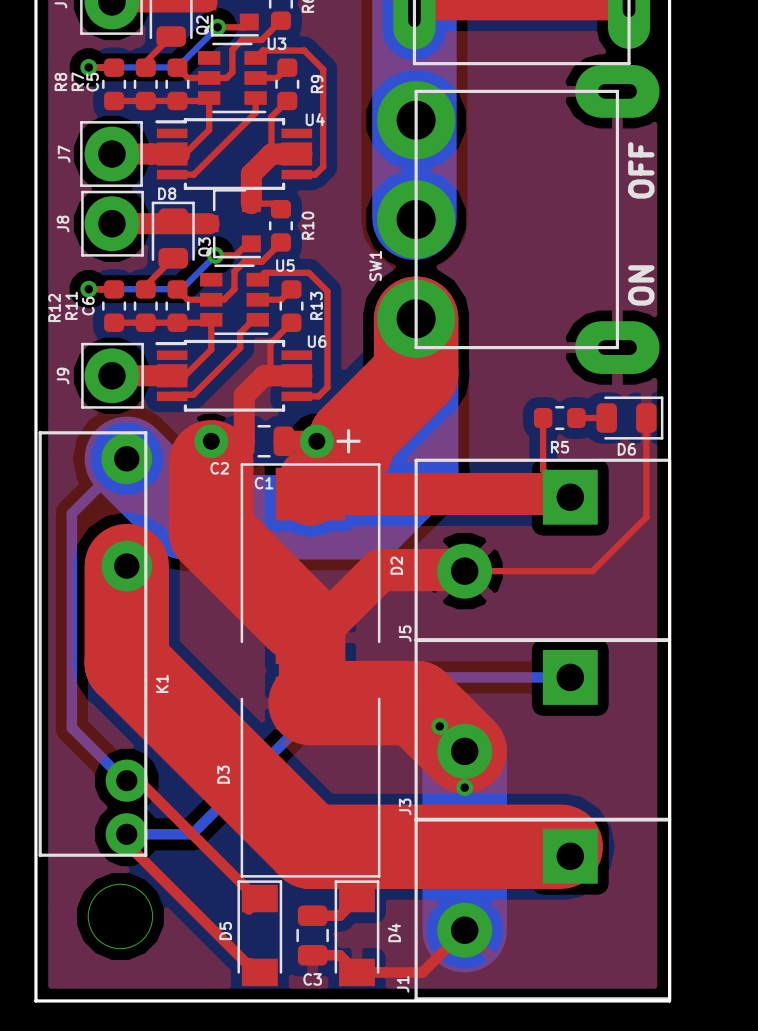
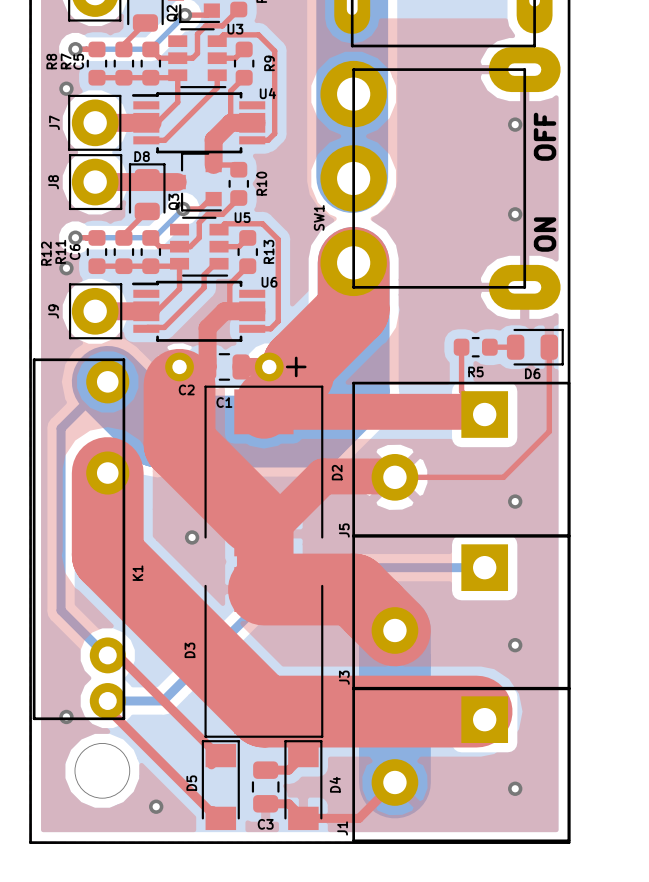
via: none -> (66, 88)
via: none -> (515, 124)
via: none -> (515, 214)
via: none -> (66, 268)
via: none -> (515, 501)
via: none -> (192, 537)
via: (439, 726) -> none
via: none -> (515, 645)
via: (464, 787) -> none
via: none -> (66, 716)
via: none -> (515, 788)
via: none -> (156, 806)

